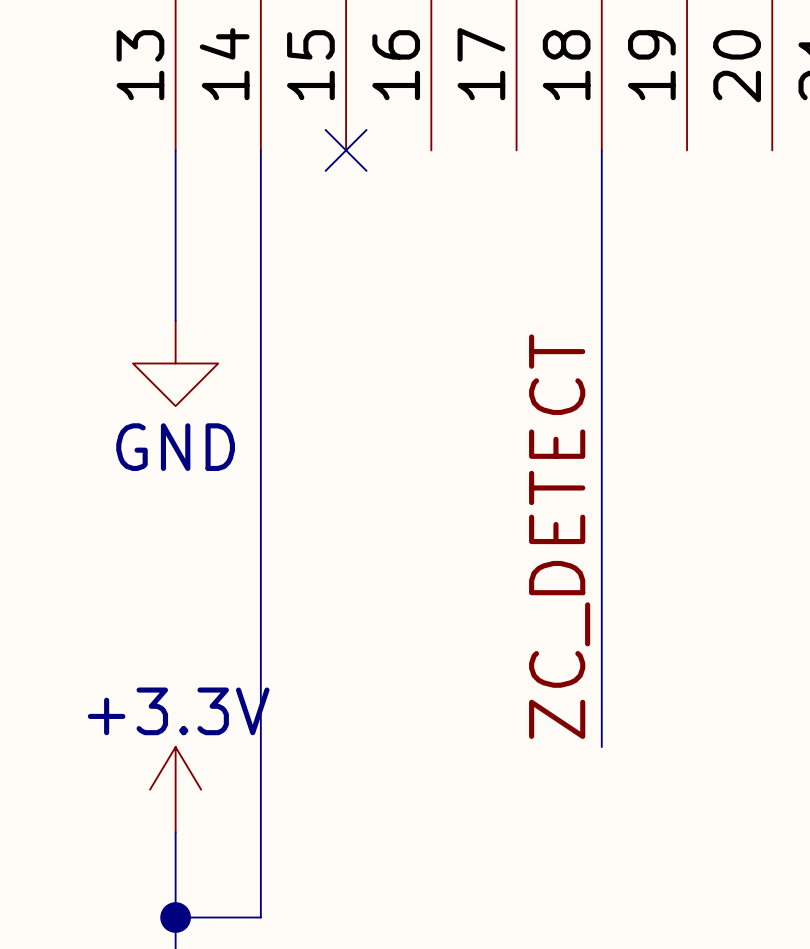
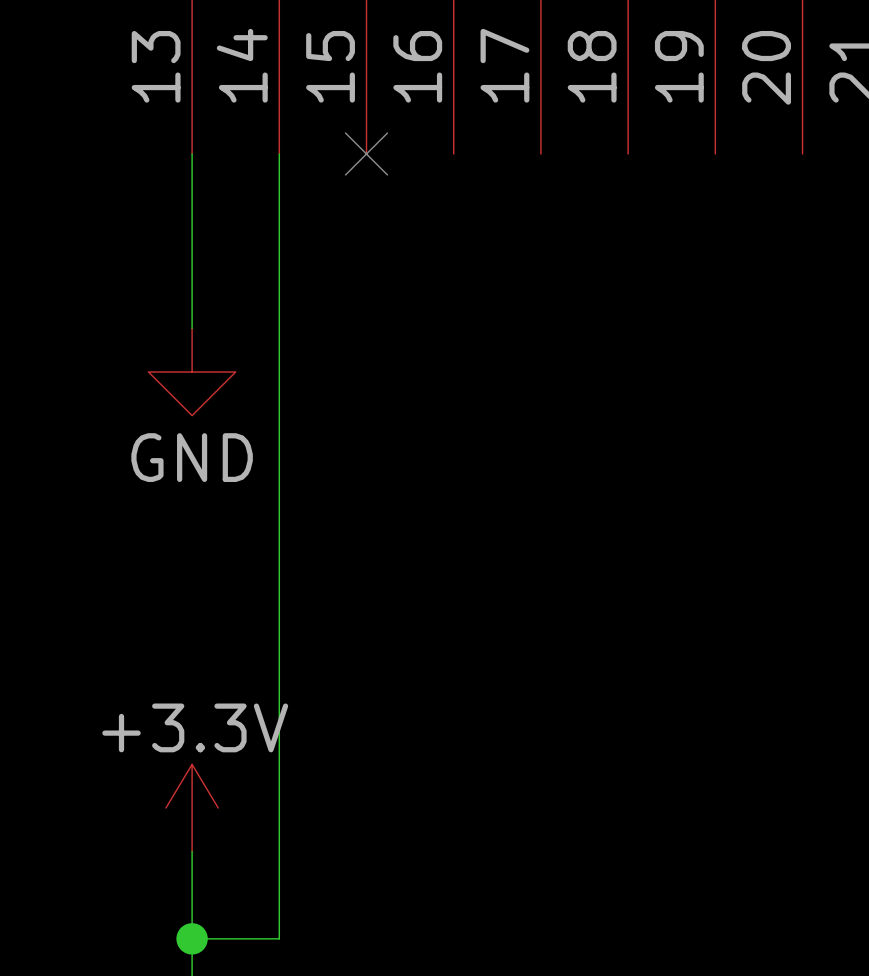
wire: (601, 150) (601, 747) -> none
label: ZC_DETECT (559, 536) -> none

